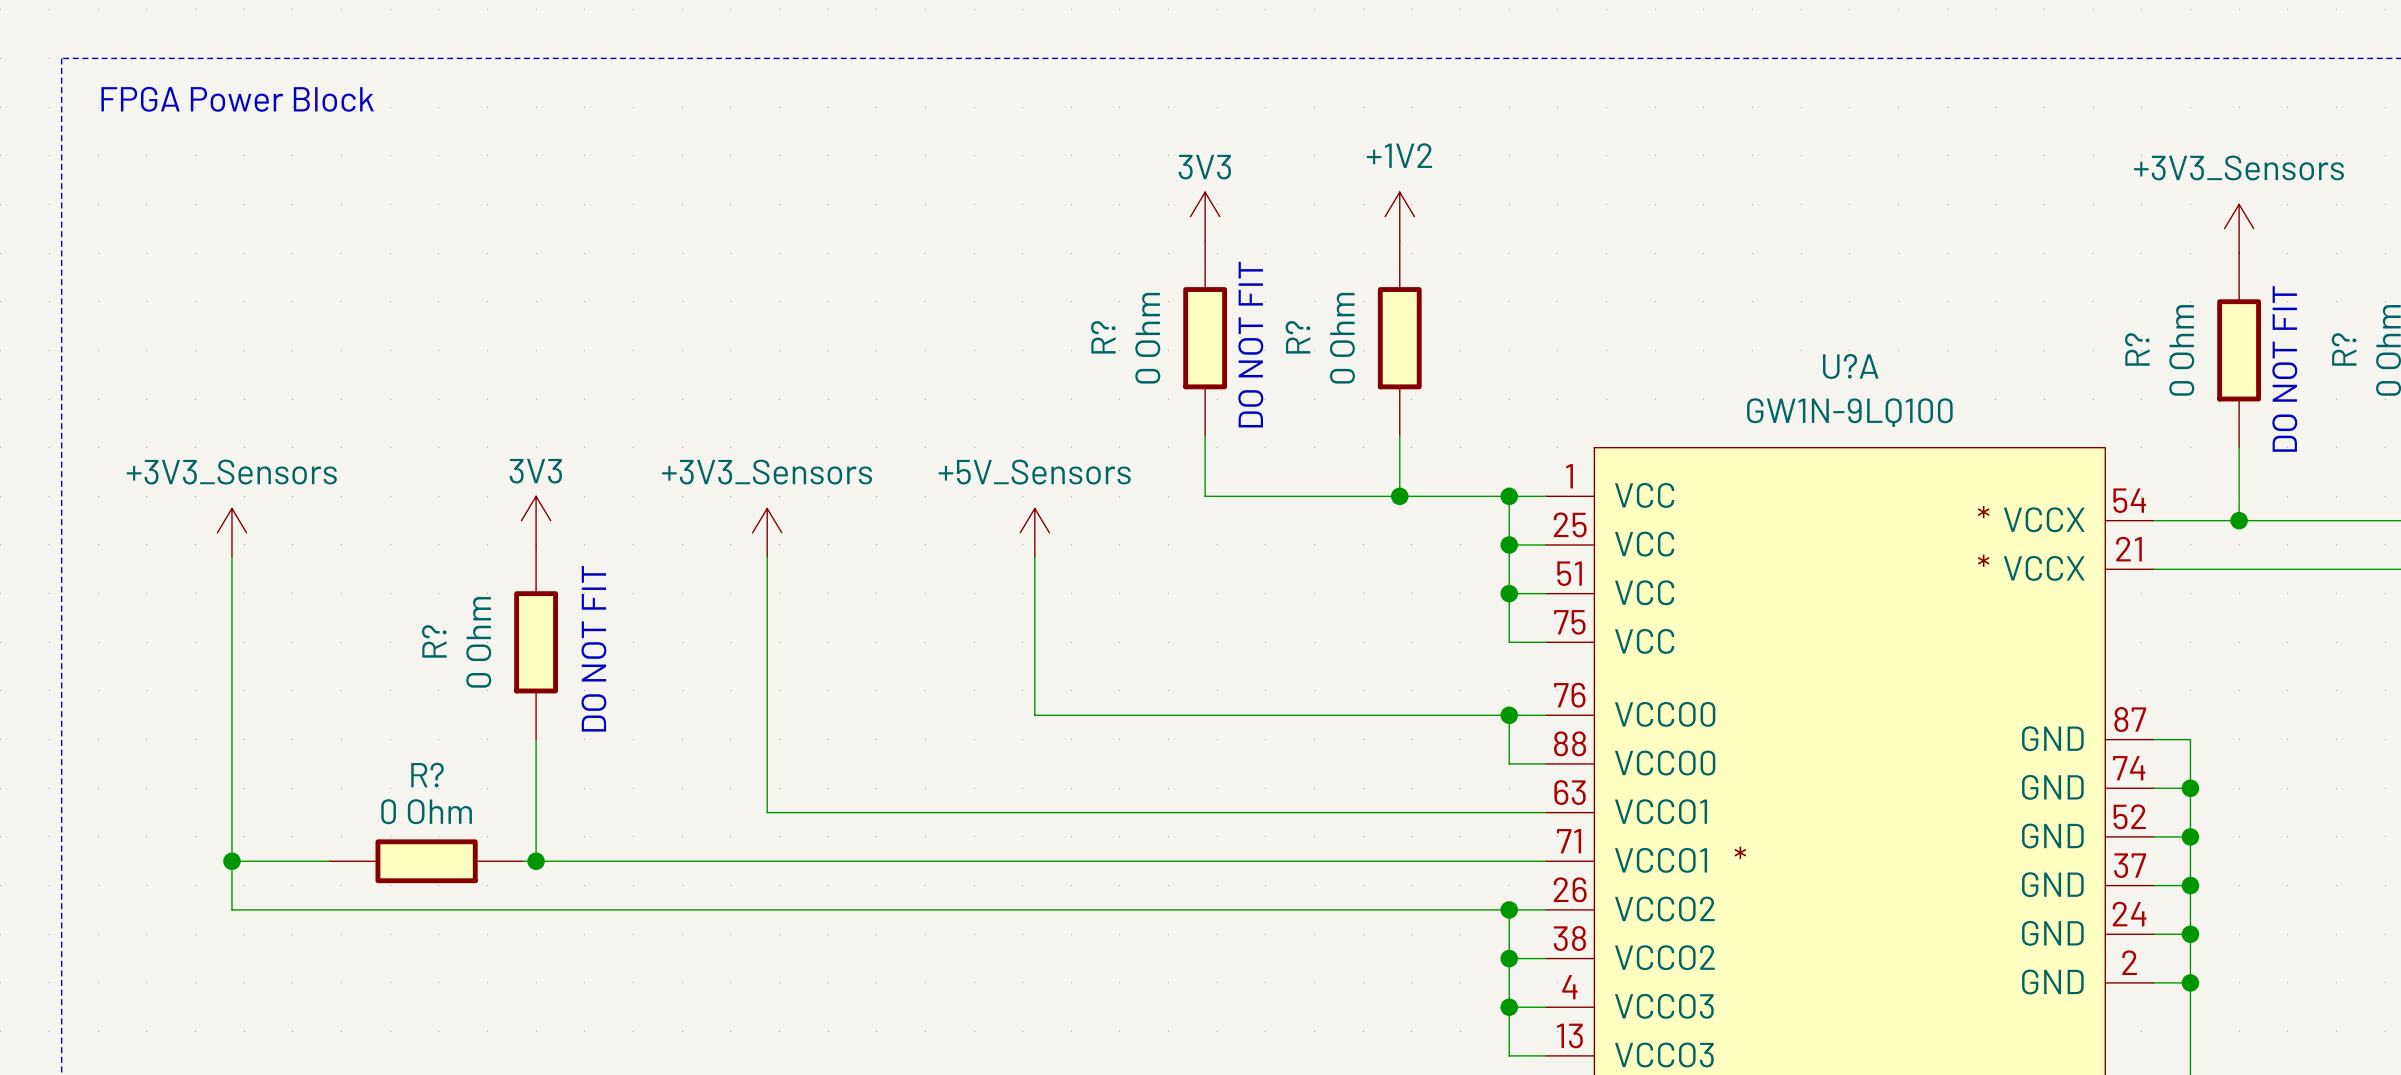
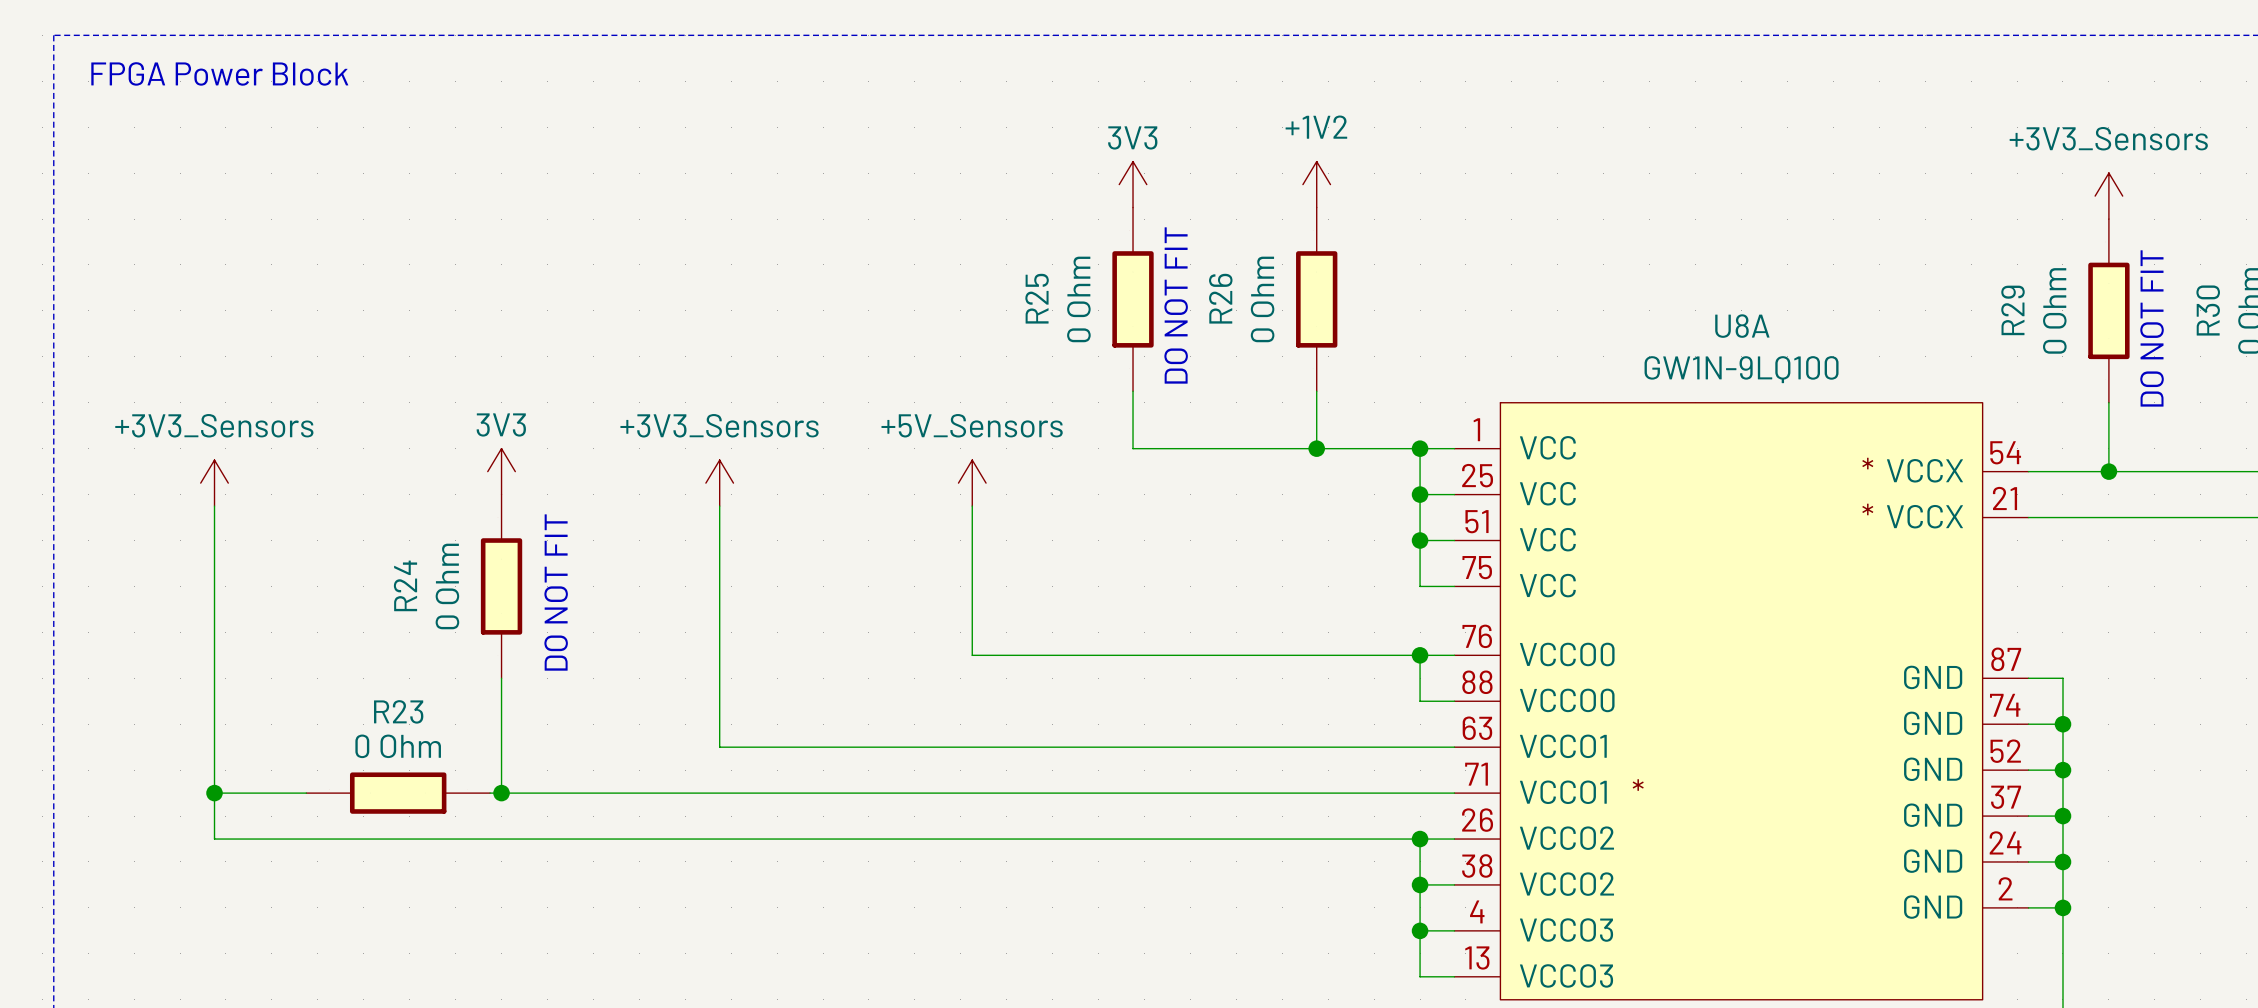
R? name: R? (1103, 337) -> R25 (1037, 298)
R? name: R? (1297, 337) -> R26 (1220, 298)
R? name: R? (2137, 349) -> R29 (2013, 310)
R? name: R? (2344, 349) -> R30 (2208, 310)
U?A name: U?A (1850, 366) -> U8A (1742, 326)
R? name: R? (434, 641) -> R24 (405, 585)
R? name: R? (427, 775) -> R23 (398, 711)

